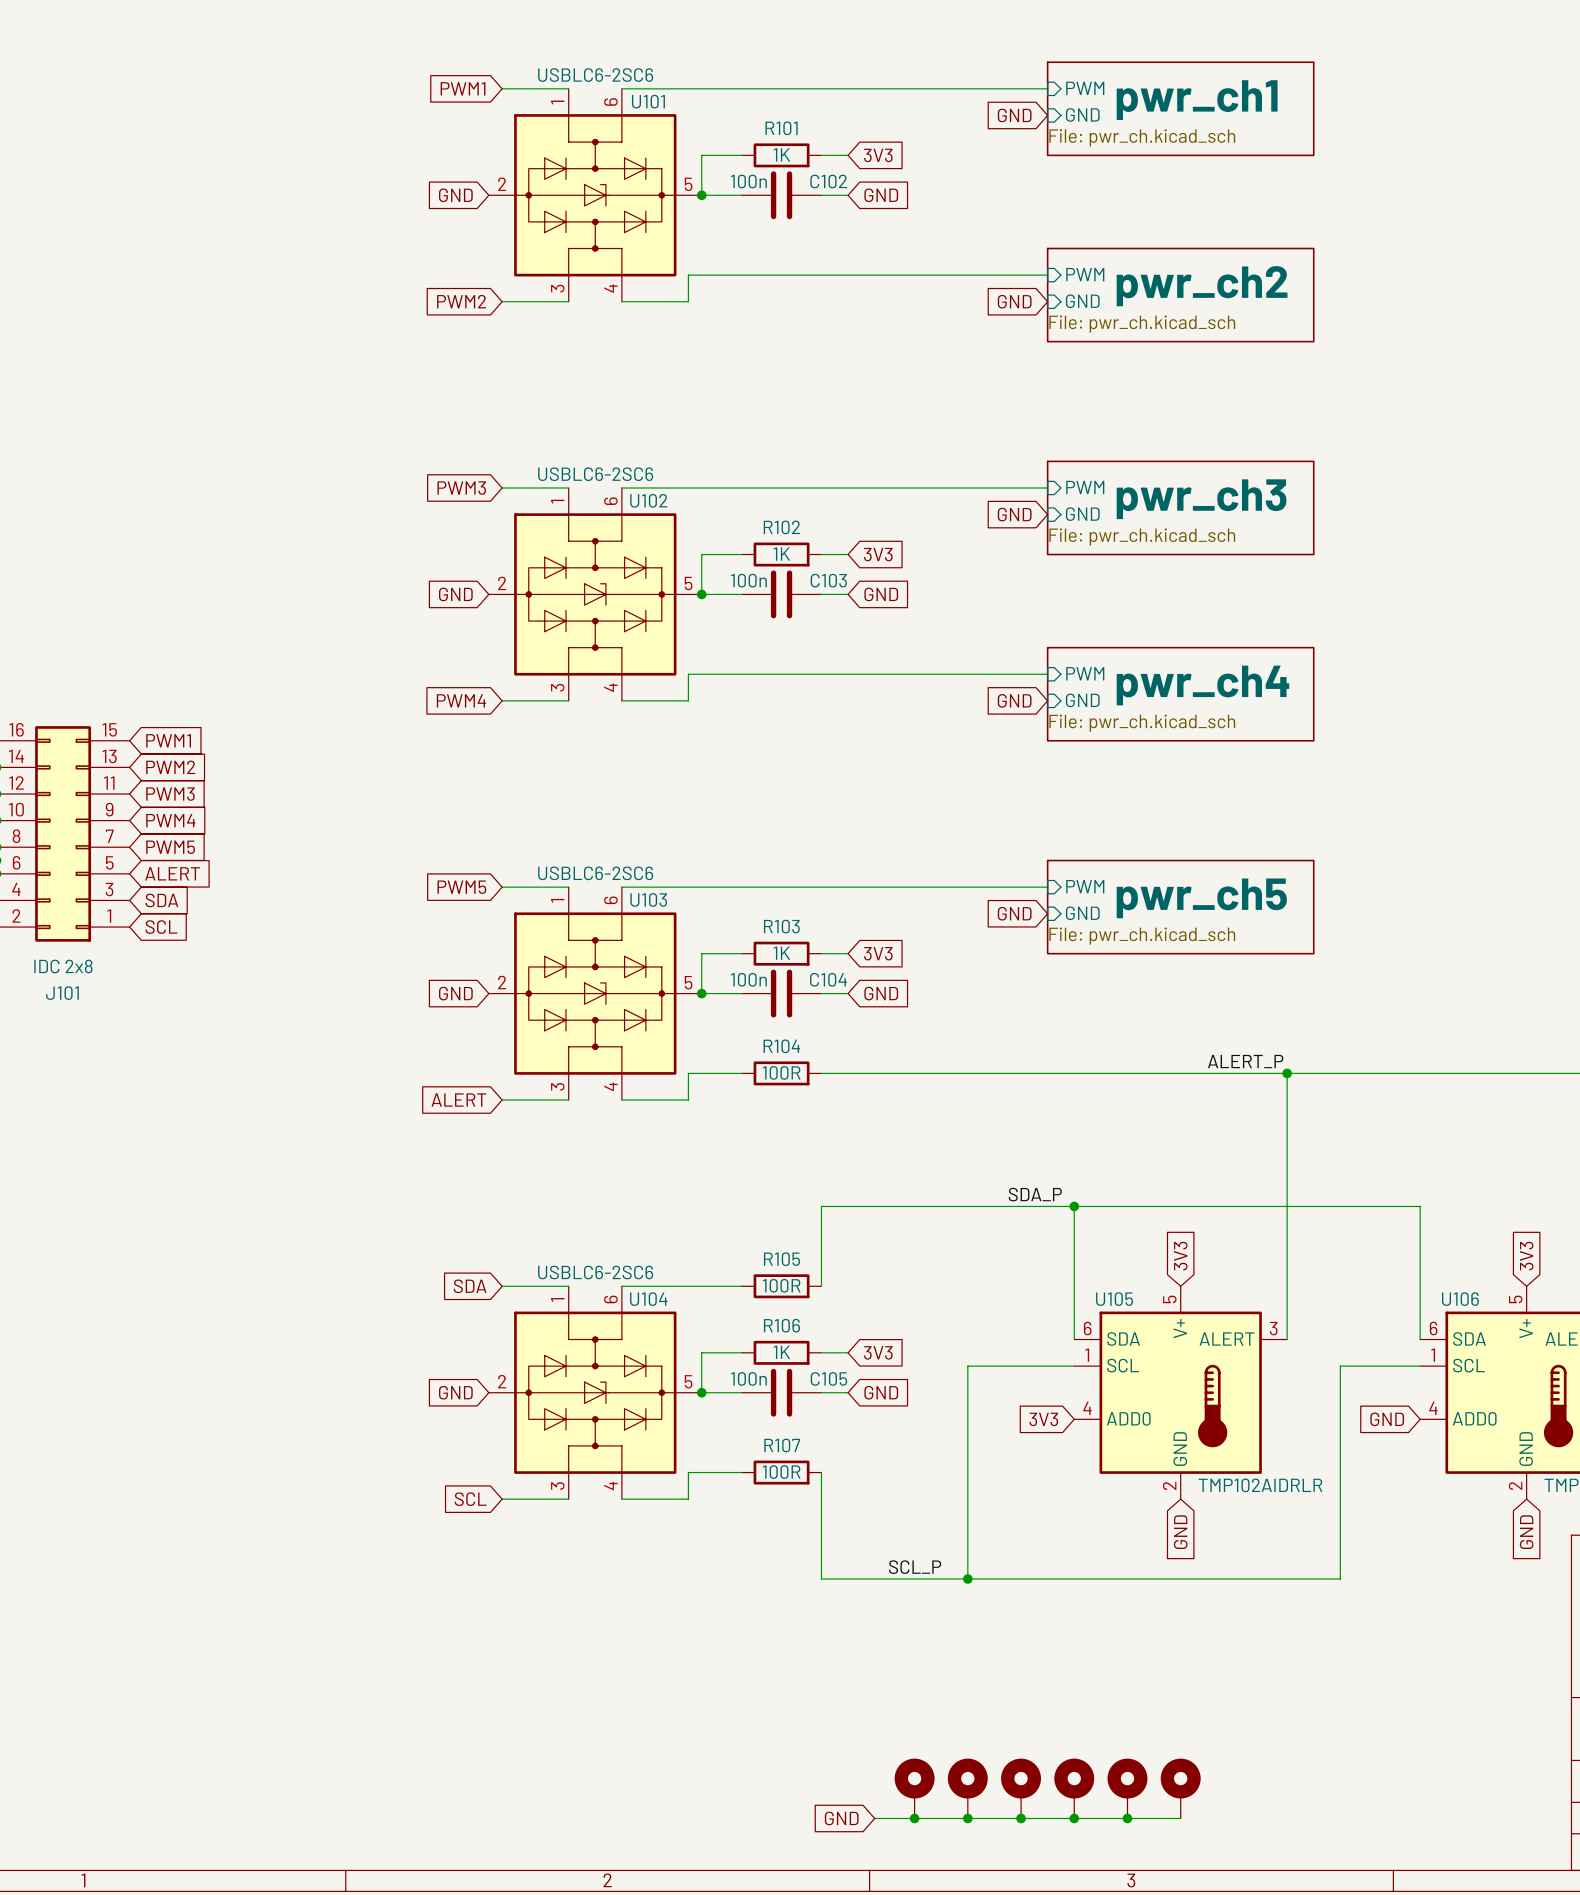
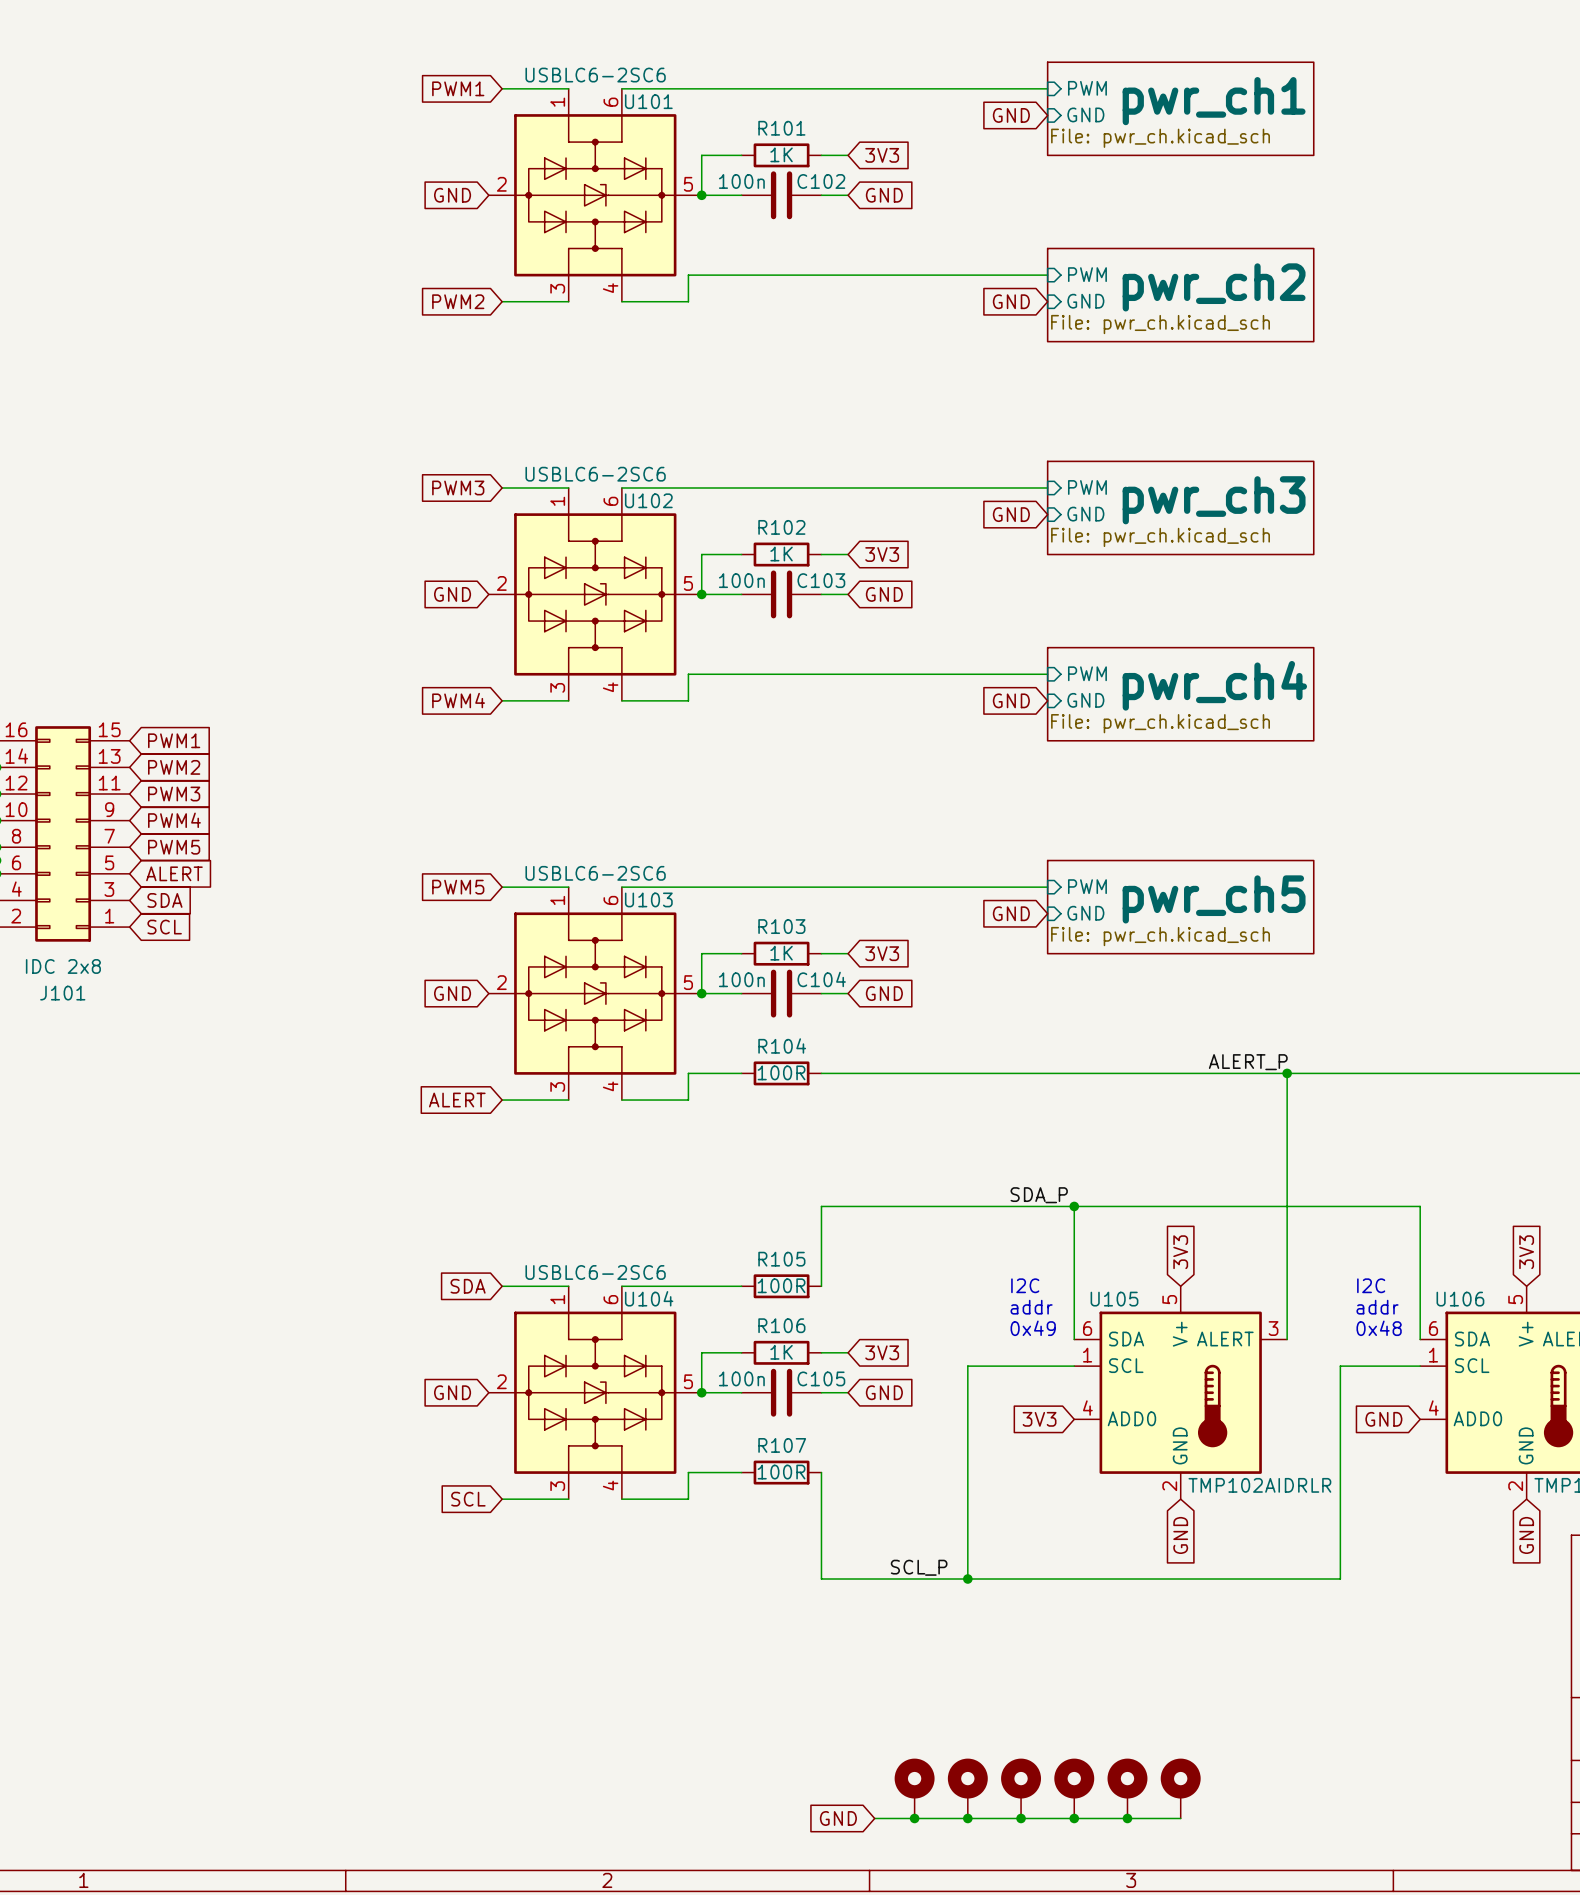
text: none -> I2C (1025, 1285)
text: none -> I2C (1371, 1285)
text: none -> addr (1031, 1307)
text: none -> addr (1377, 1307)
text: none -> 0x49 (1033, 1328)
text: none -> 0x48 (1379, 1328)

